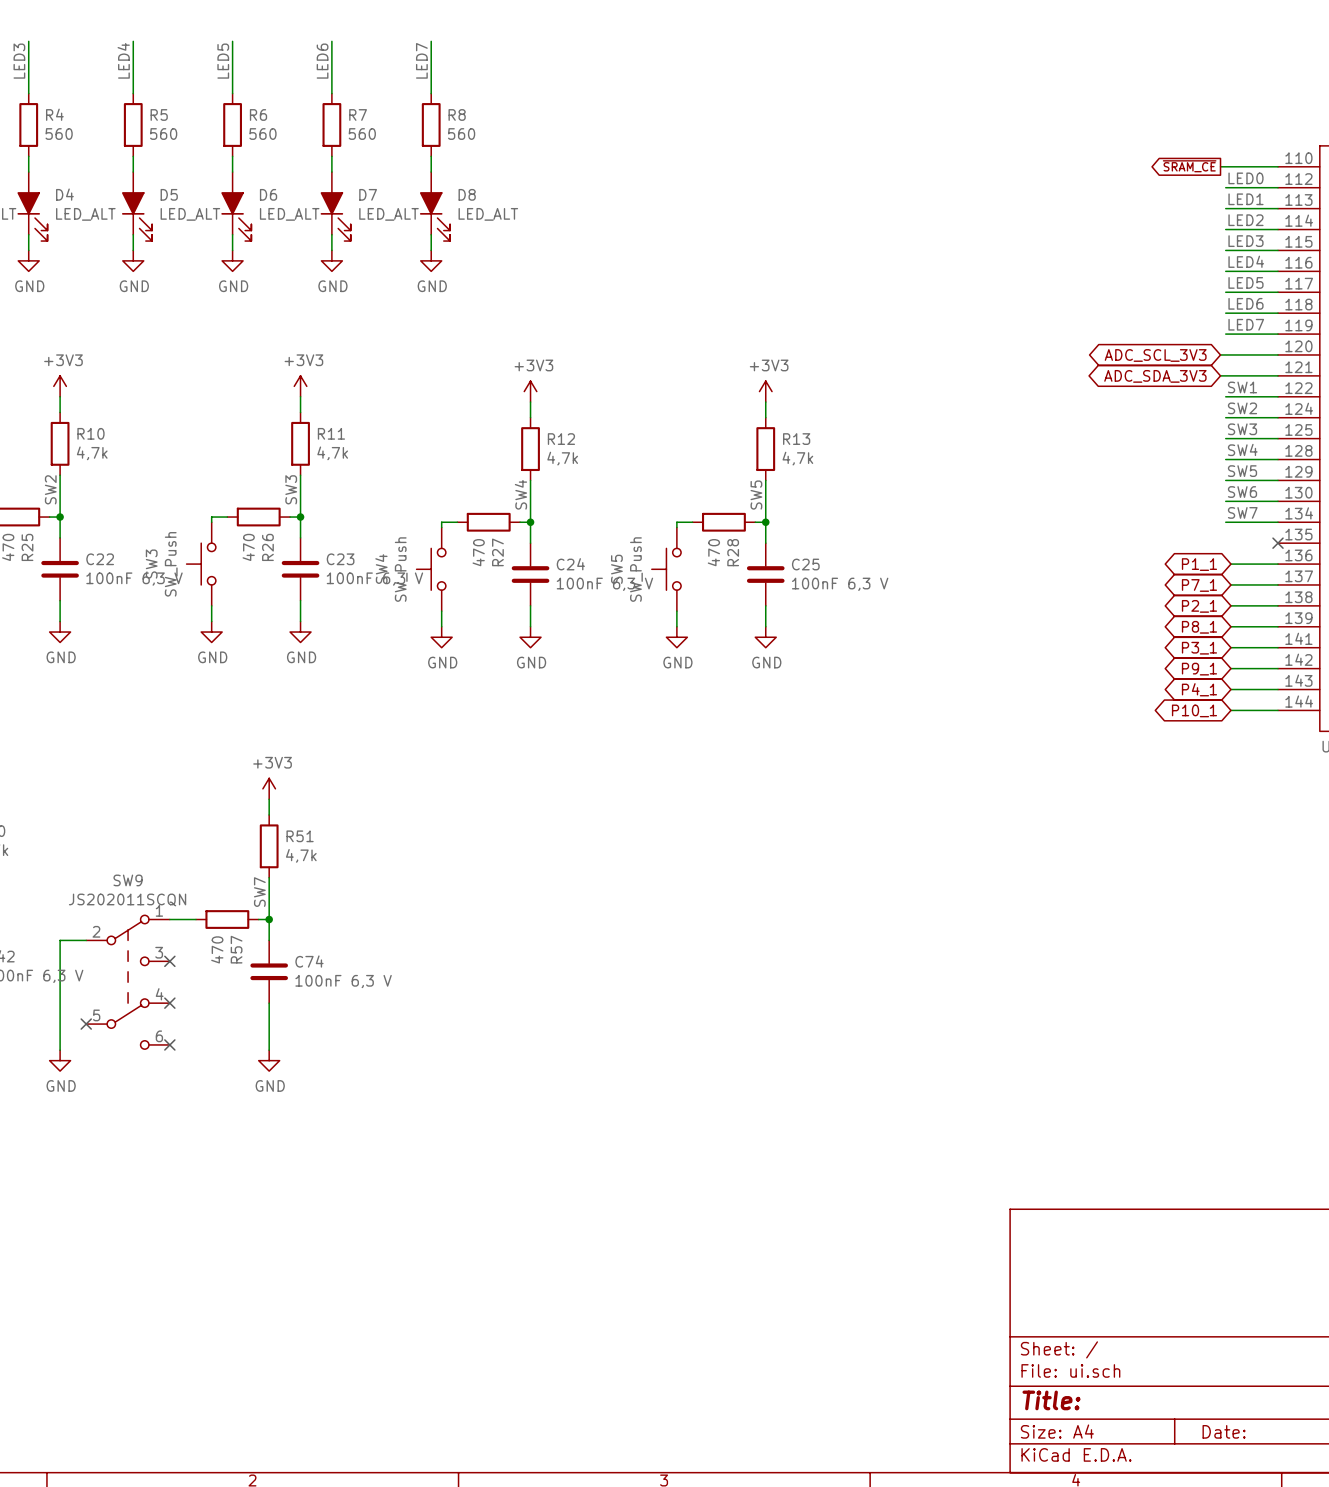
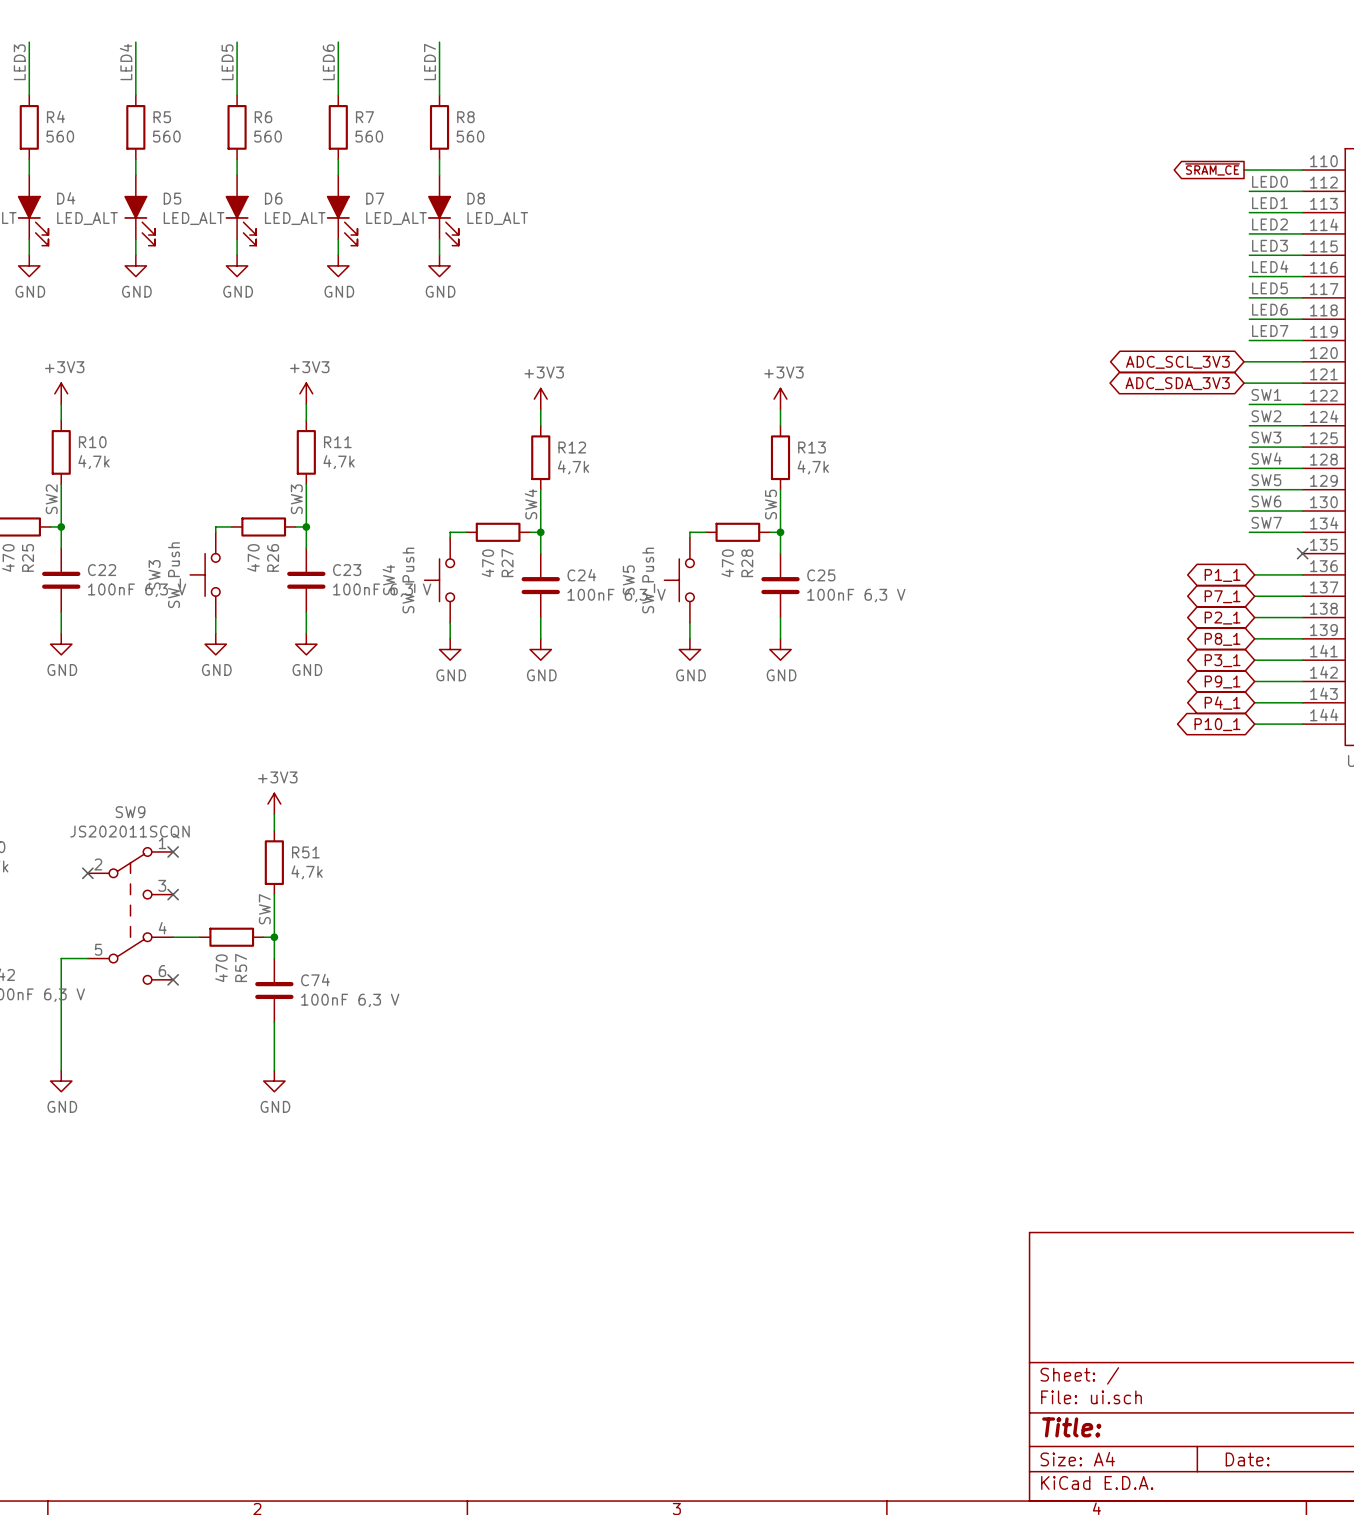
no-connect mark: none -> (173, 851)
no-connect mark: none -> (87, 873)
no-connect mark: none -> (173, 894)
SW9 position: (128, 982) -> (130, 915)
no-connect mark: (169, 1003) -> none
no-connect mark: (86, 1024) -> none
no-connect mark: (169, 1044) -> none

